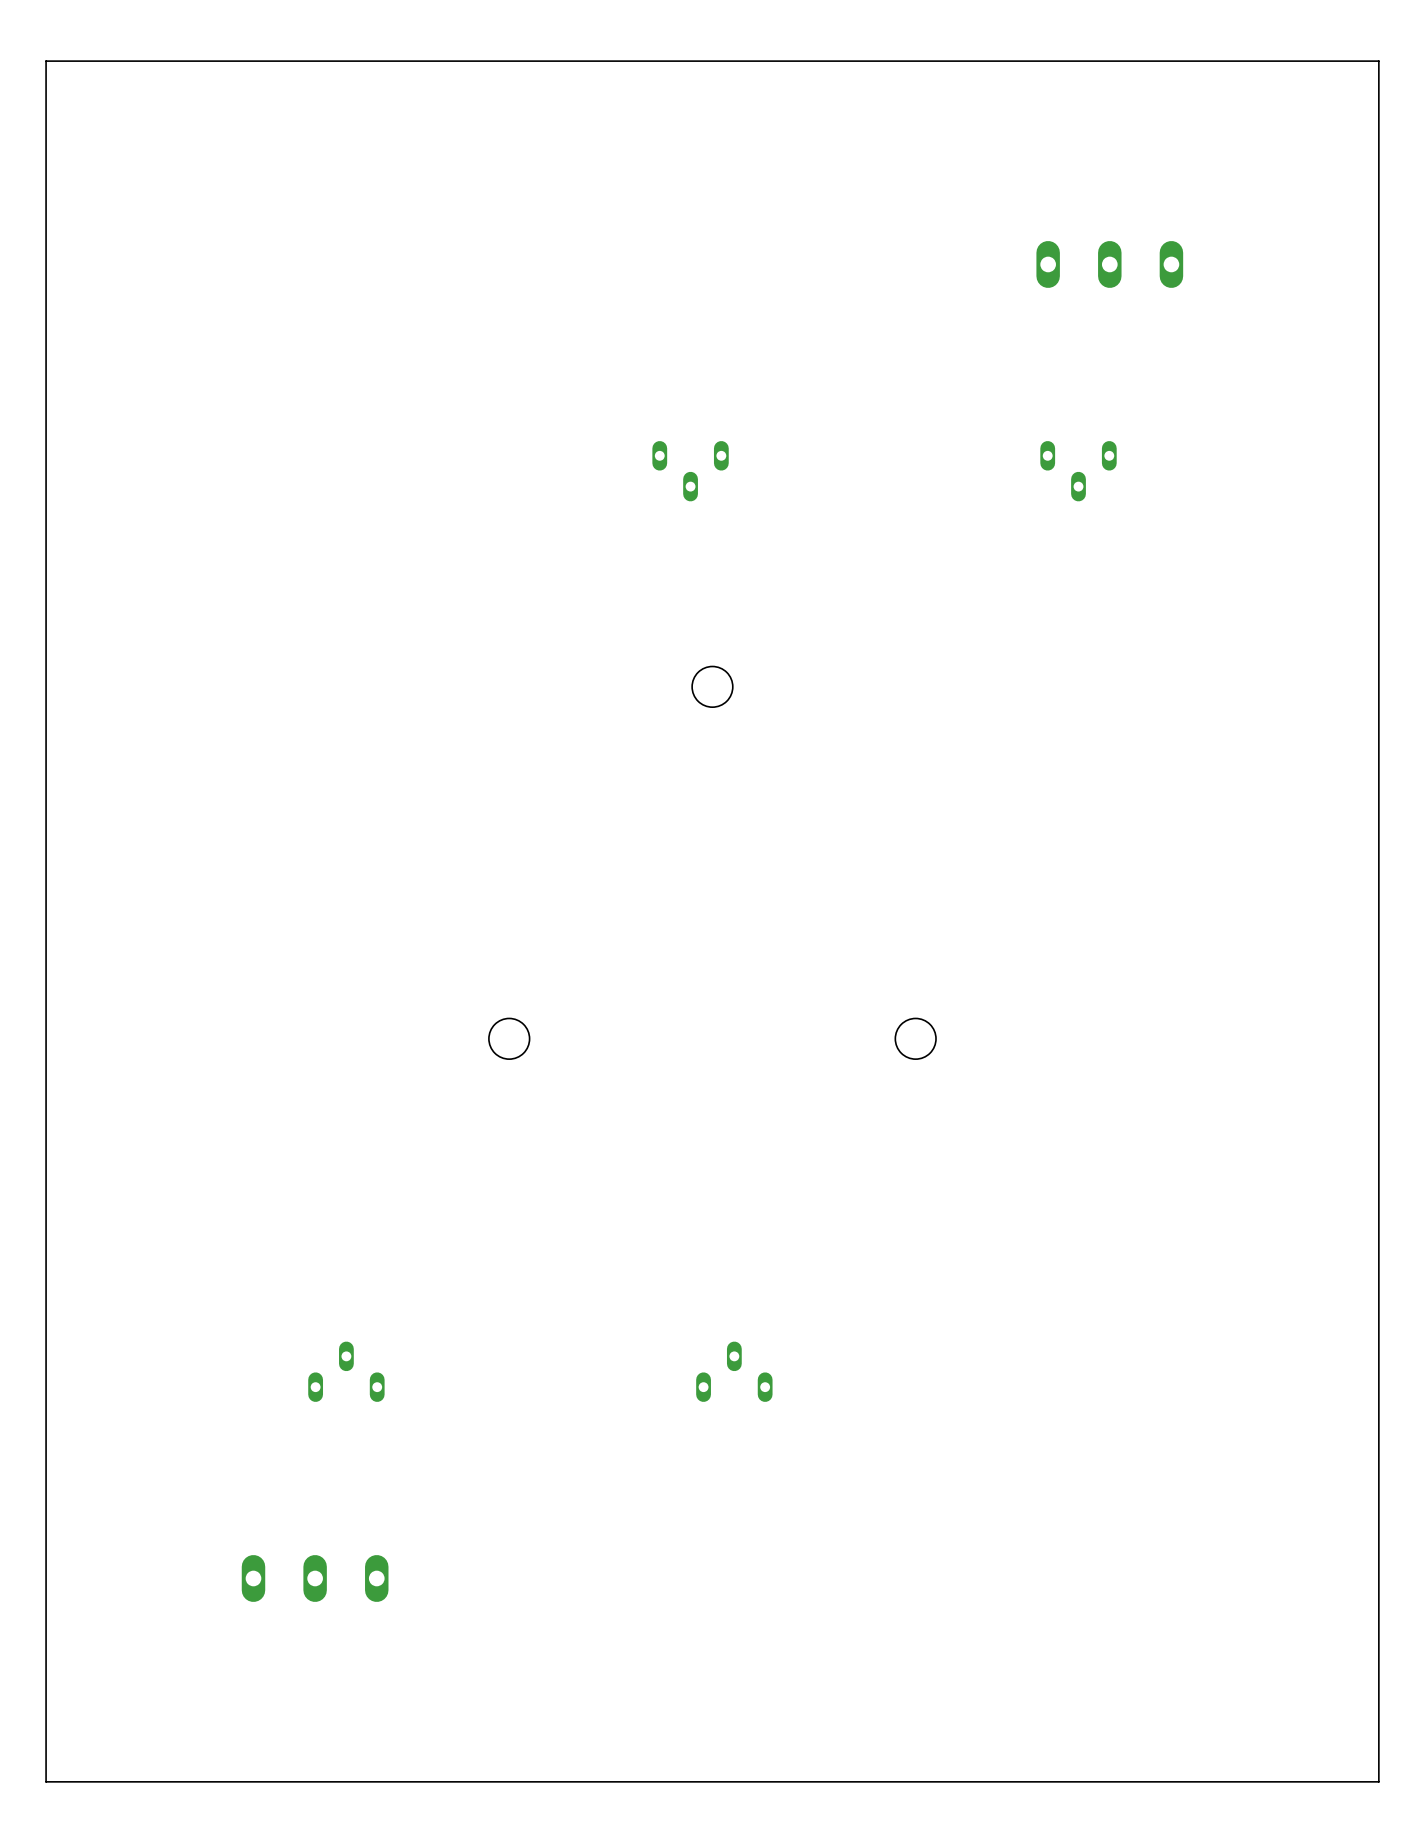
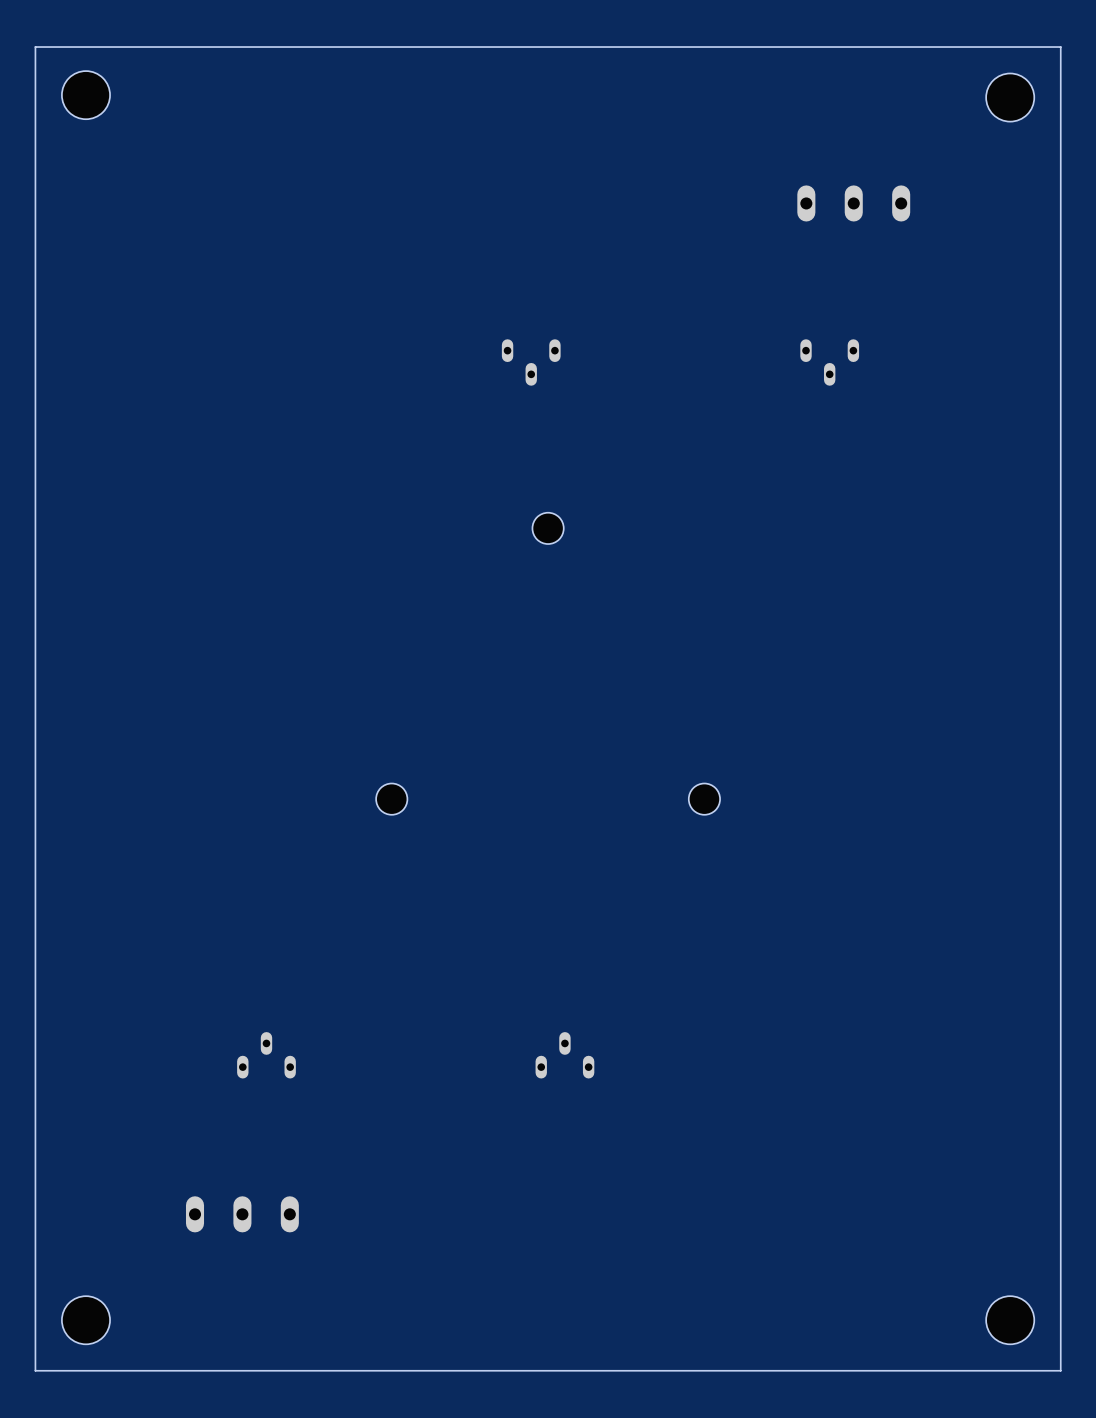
hole: none -> (85, 95)
hole: none -> (1010, 97)
hole: none -> (85, 1320)
hole: none -> (1010, 1320)

